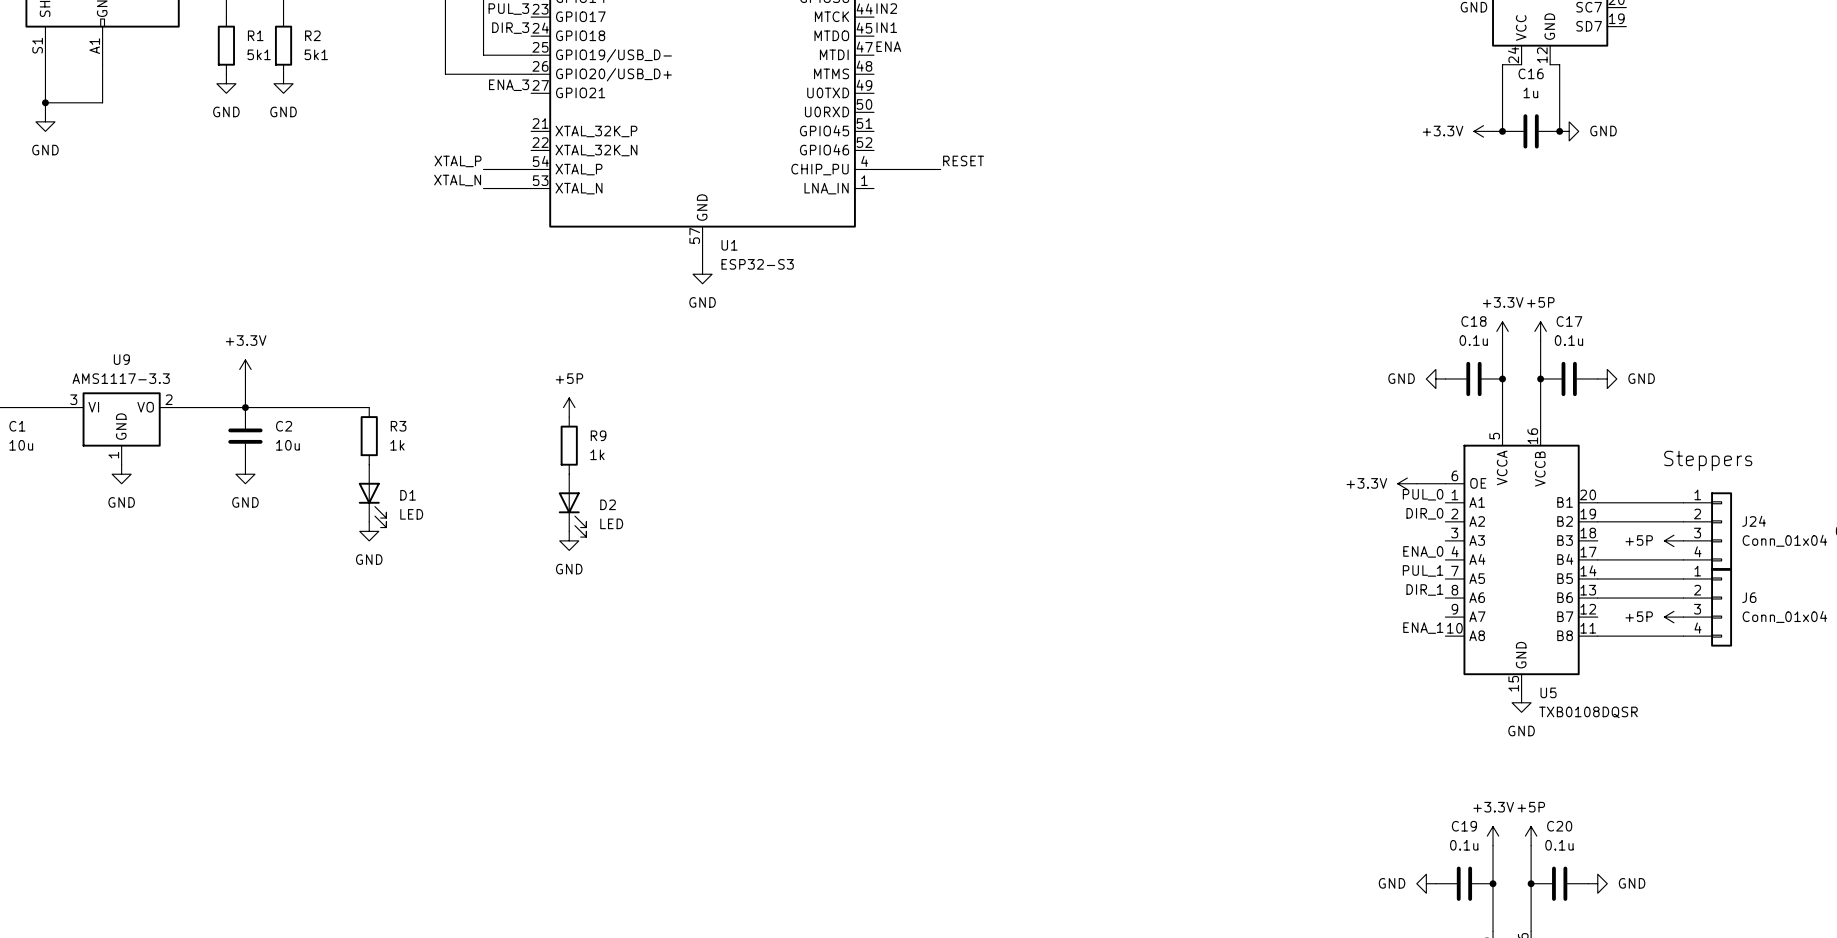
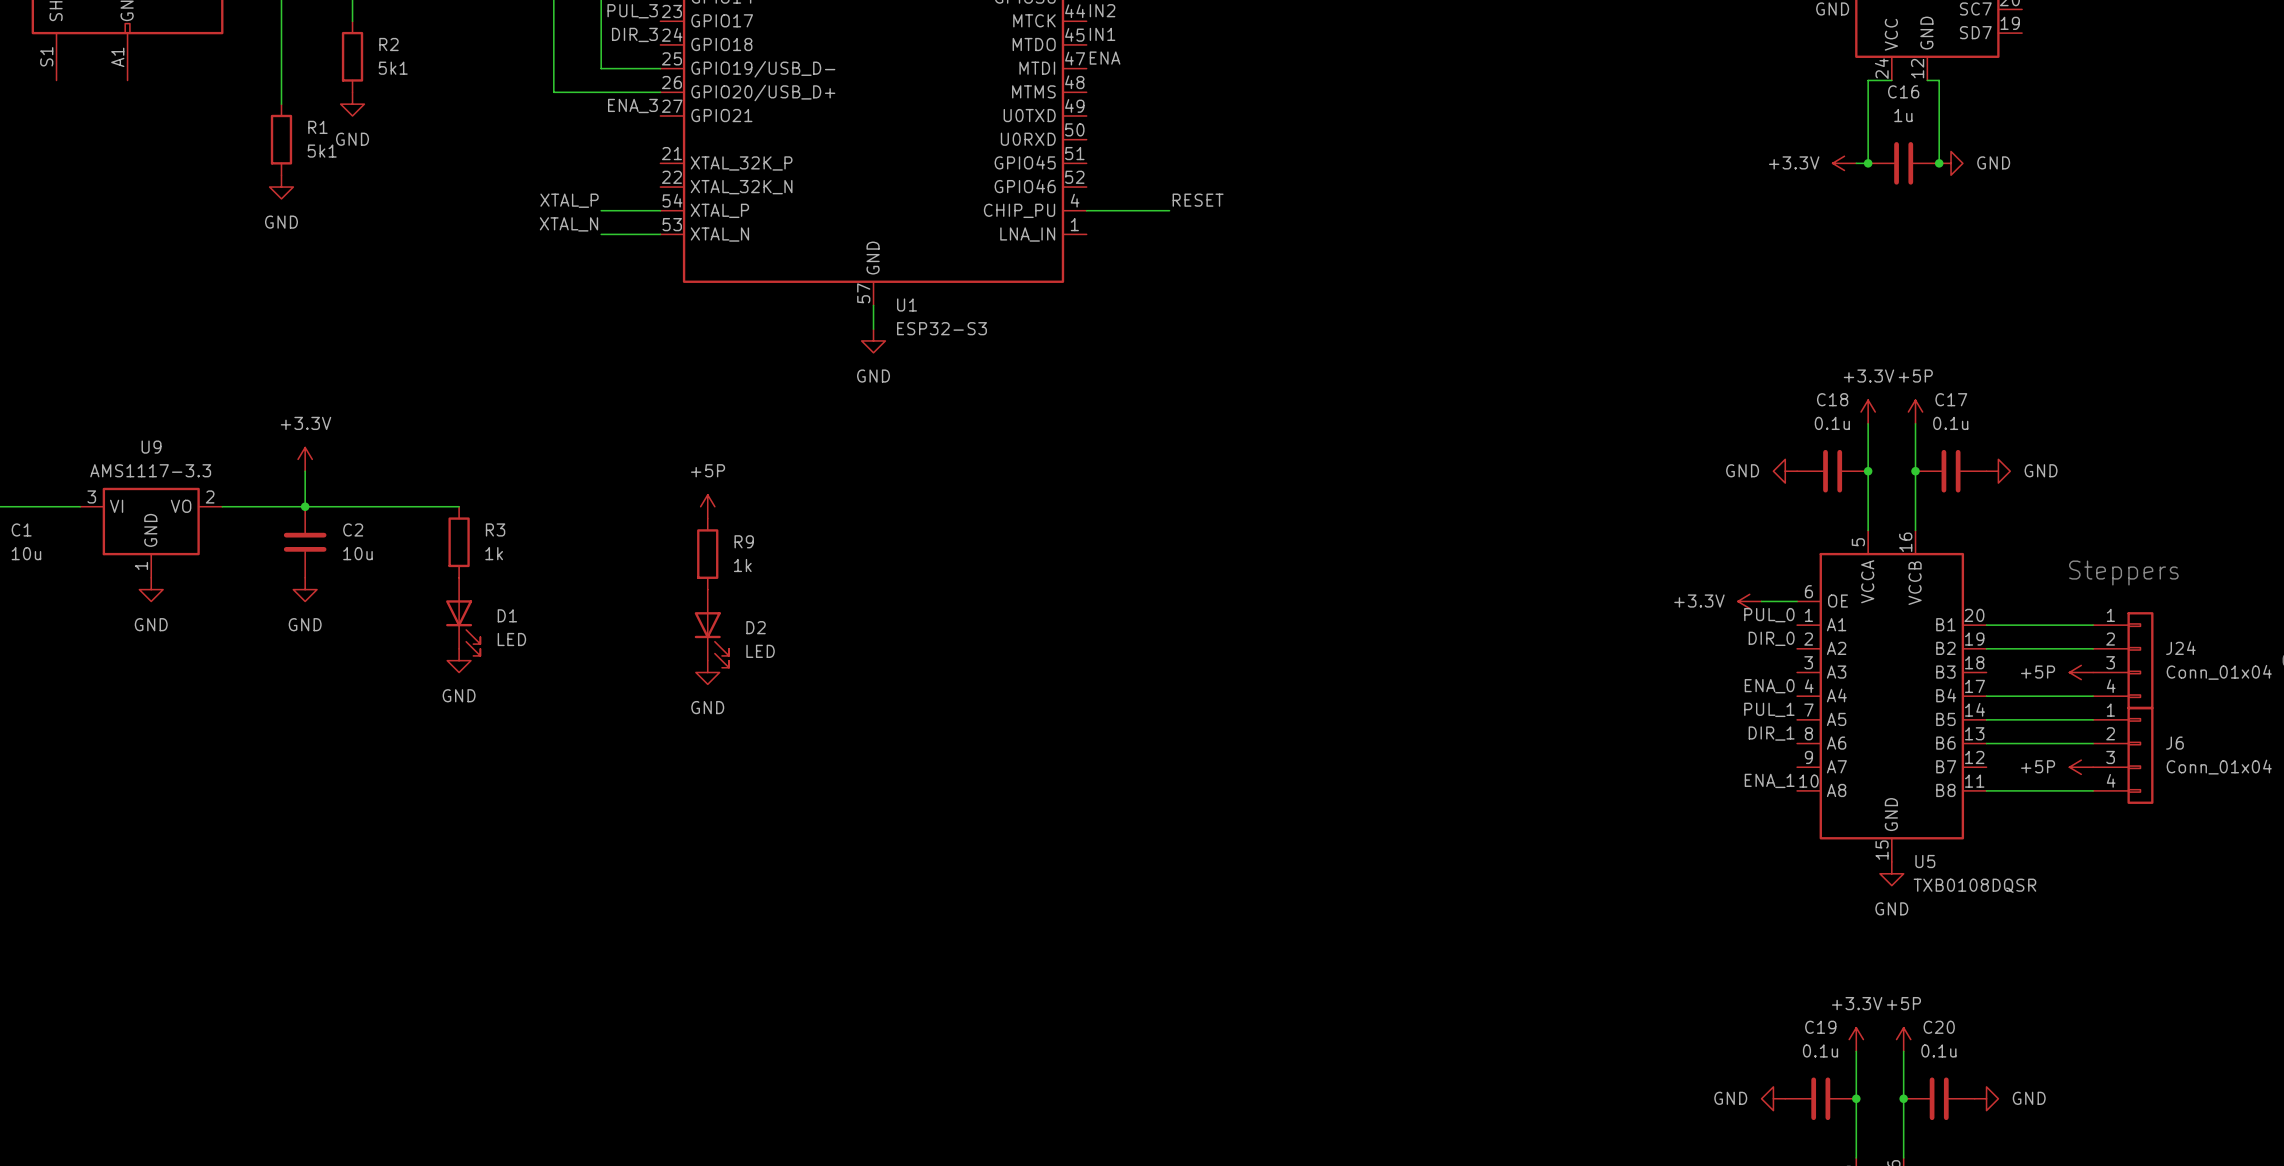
wire: none -> (281, 21) (281, 104)
R1 position: (226, 45) -> (281, 139)
wire: (45, 64) (45, 112) -> none
wire: (102, 64) (102, 102) (45, 102) -> none
power symbol position: GND (226, 83) -> GND (281, 187)
junction: (45, 102) -> none
power symbol: GND (45, 121) -> none

